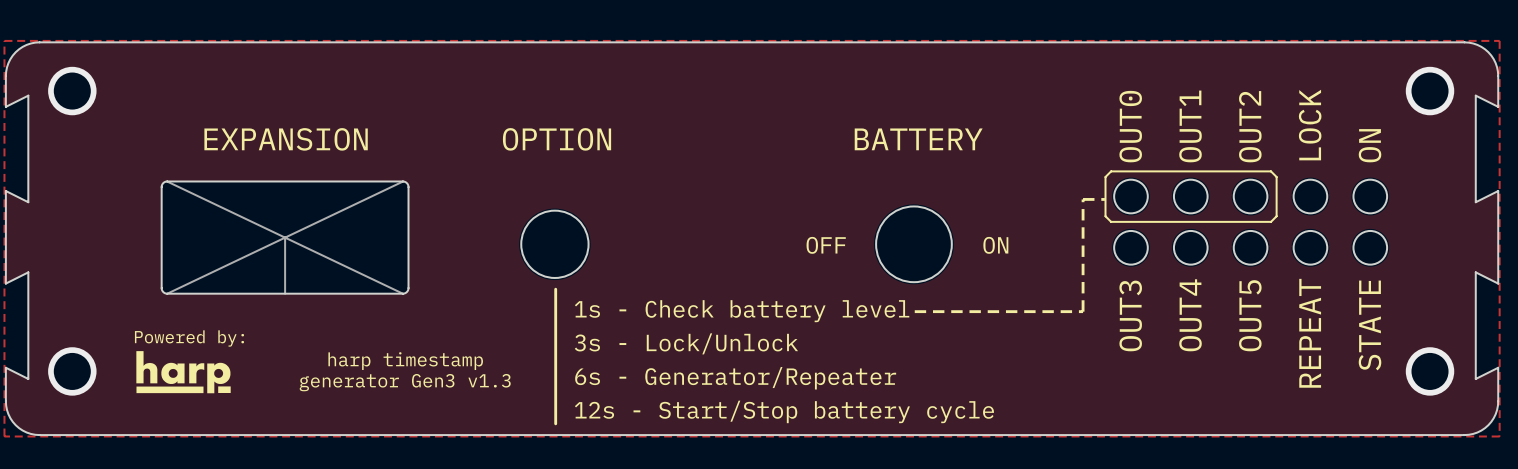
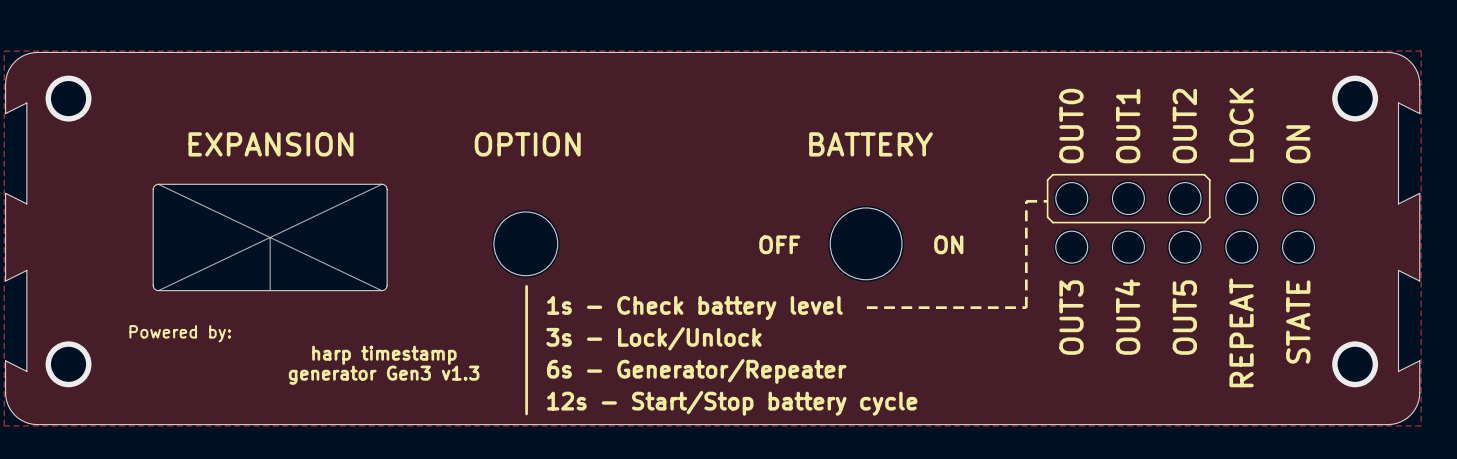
drawing: [136, 351, 231, 394] -> none

